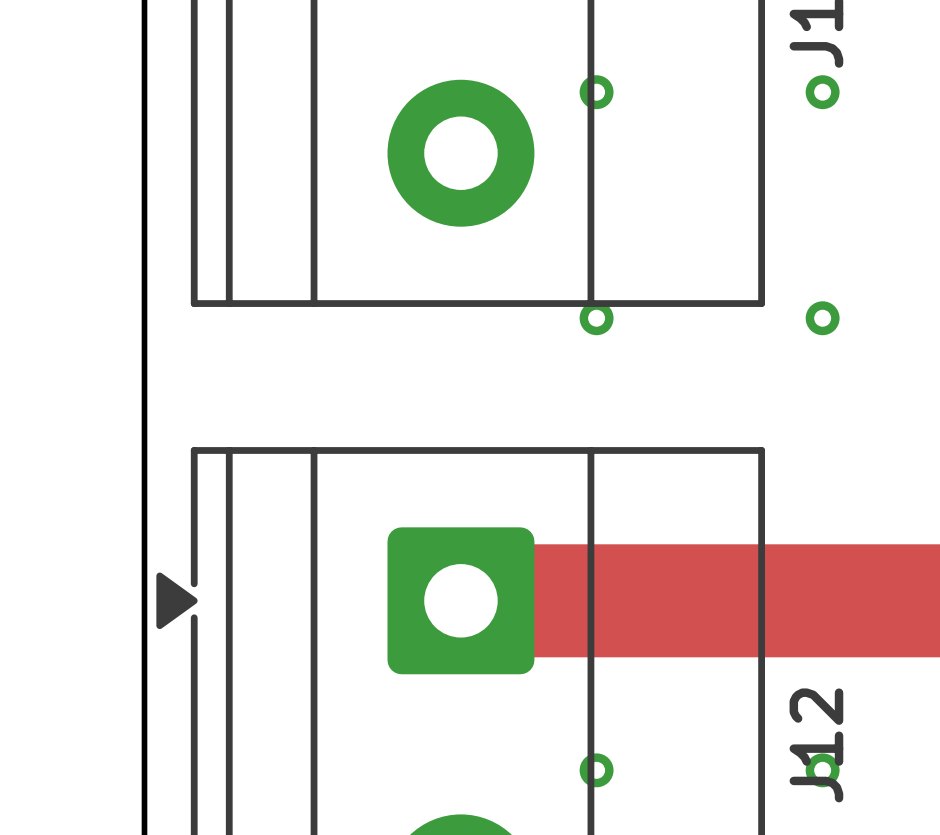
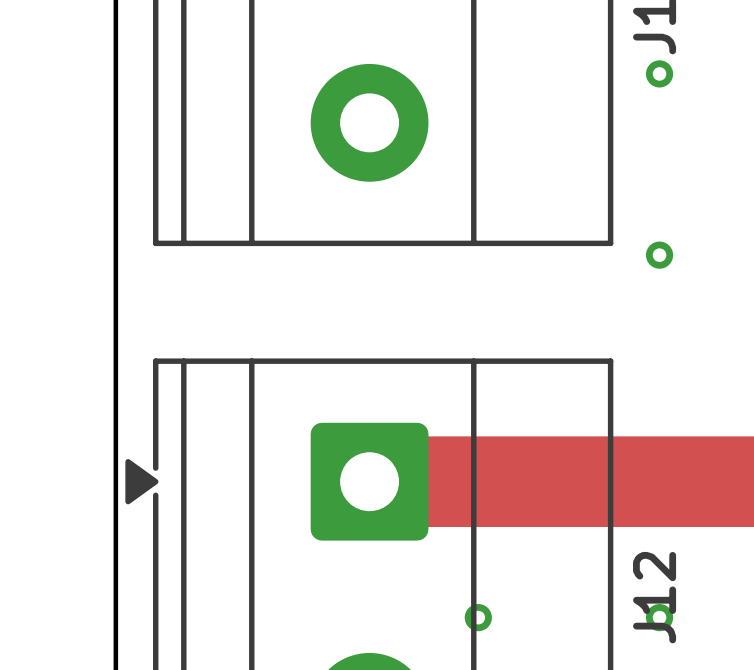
via: (596, 92) -> none
via: (596, 318) -> none

